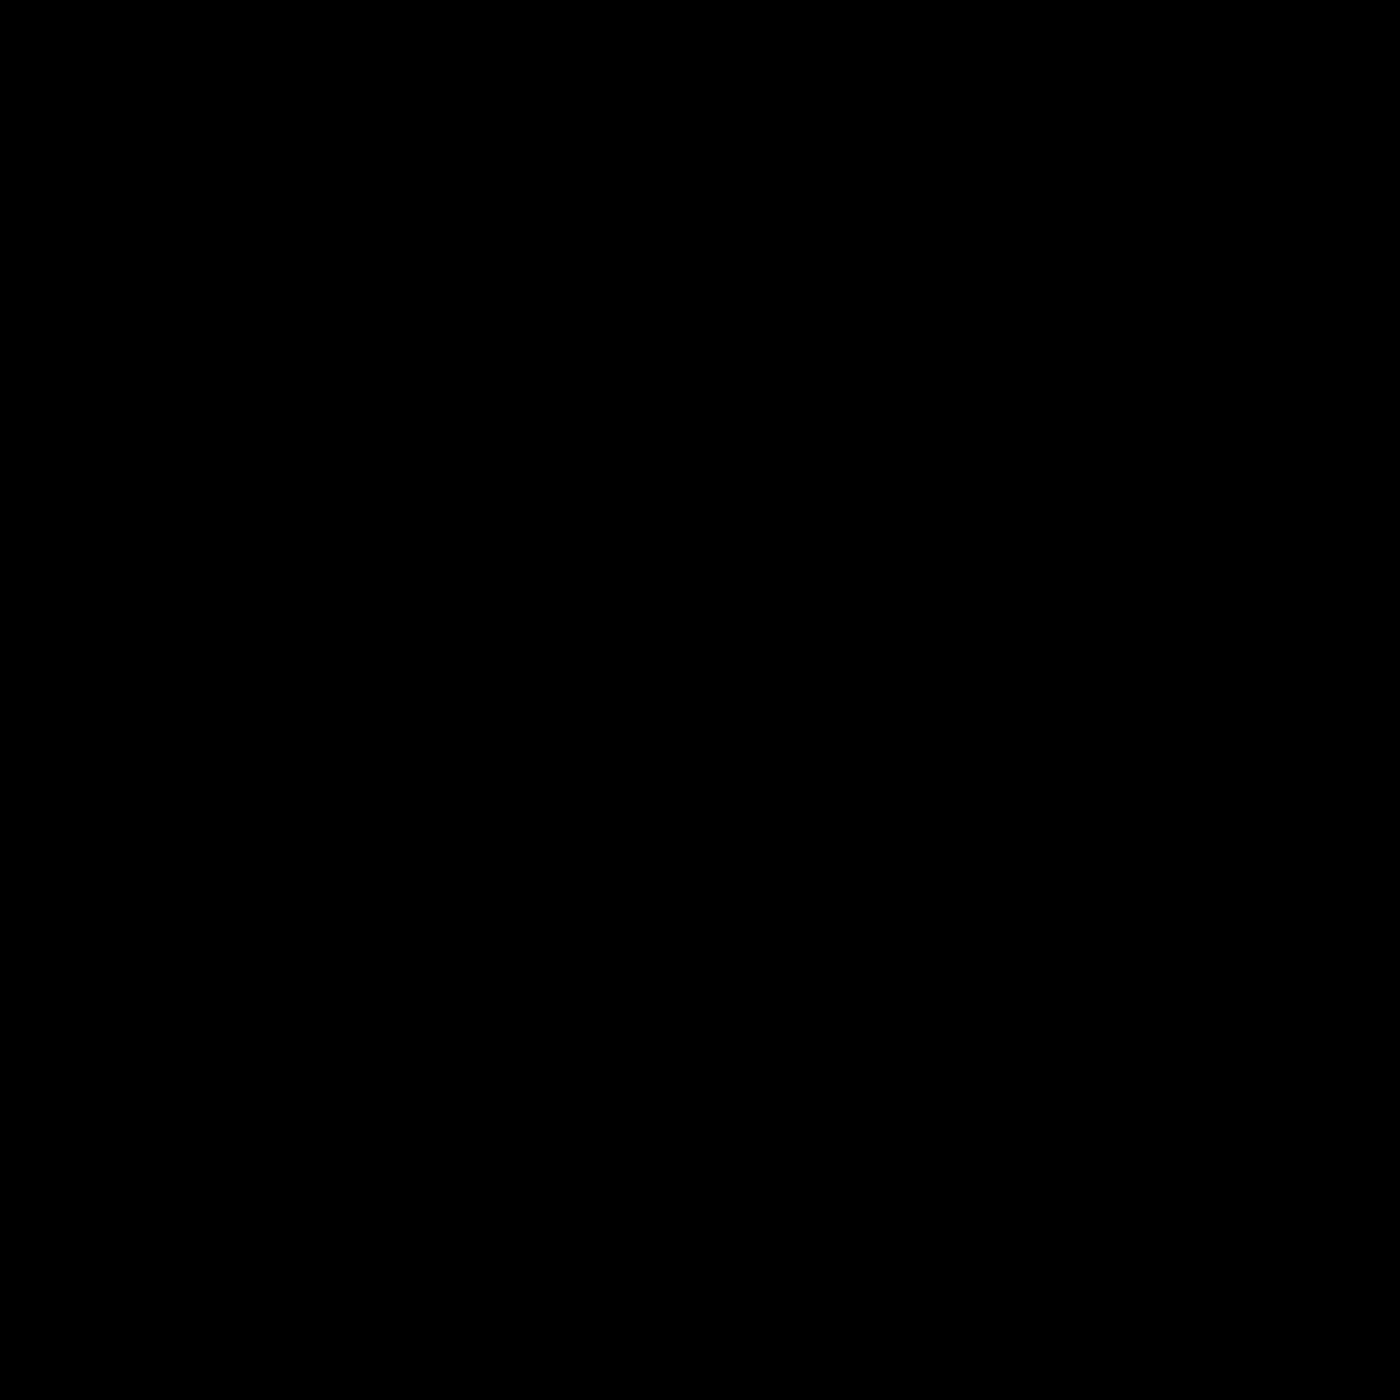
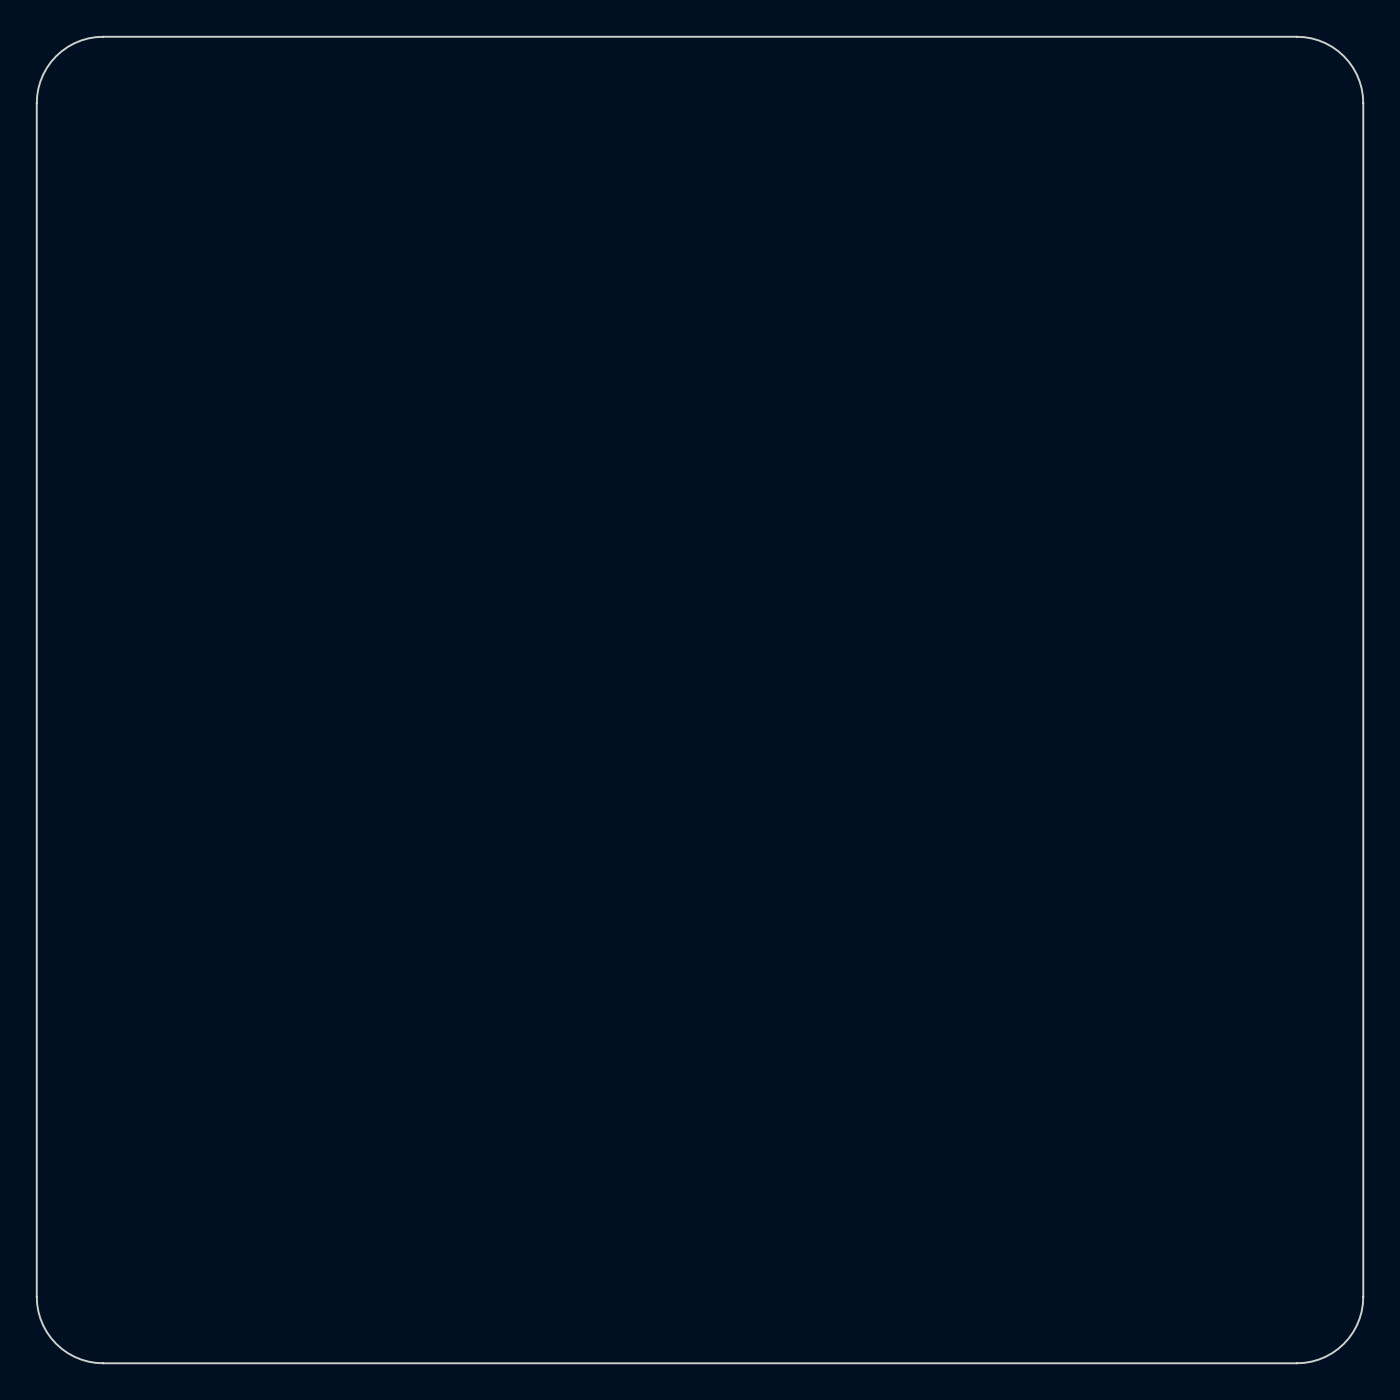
board edge: none -> (103, 36) (1296, 36) (1311, 38) (1325, 43) (1343, 56) (1353, 67) (1359, 81) (1363, 103) (1363, 1296) (1361, 1311) (1356, 1325) (1343, 1343) (1332, 1353) (1318, 1359) (1296, 1363) (103, 1363) (88, 1361) (74, 1356) (56, 1343) (46, 1332) (40, 1318) (36, 1296) (36, 103) (38, 88) (43, 74) (56, 56) (67, 46) (81, 40) (103, 36)

